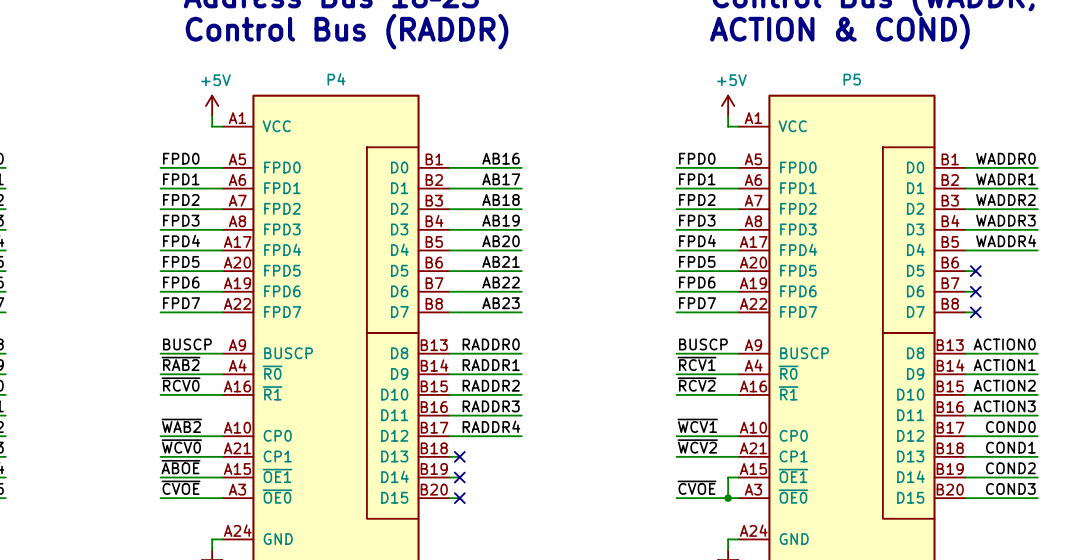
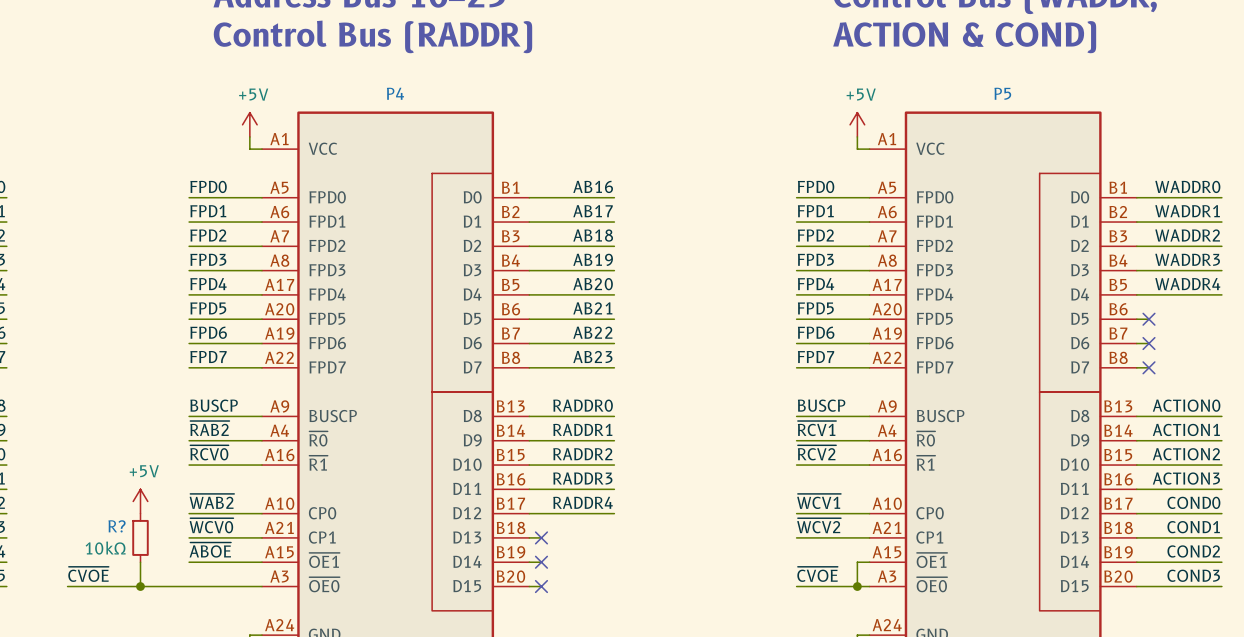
power symbol: none -> +5V (140, 501)
R?: none -> 10kΩ (140, 537)
wire: none -> (140, 562) (140, 586)
label position: ~{CVOE} (181, 487) -> ~{CVOE} (88, 574)
wire: none -> (67, 586) (189, 586)
junction: none -> (140, 586)

